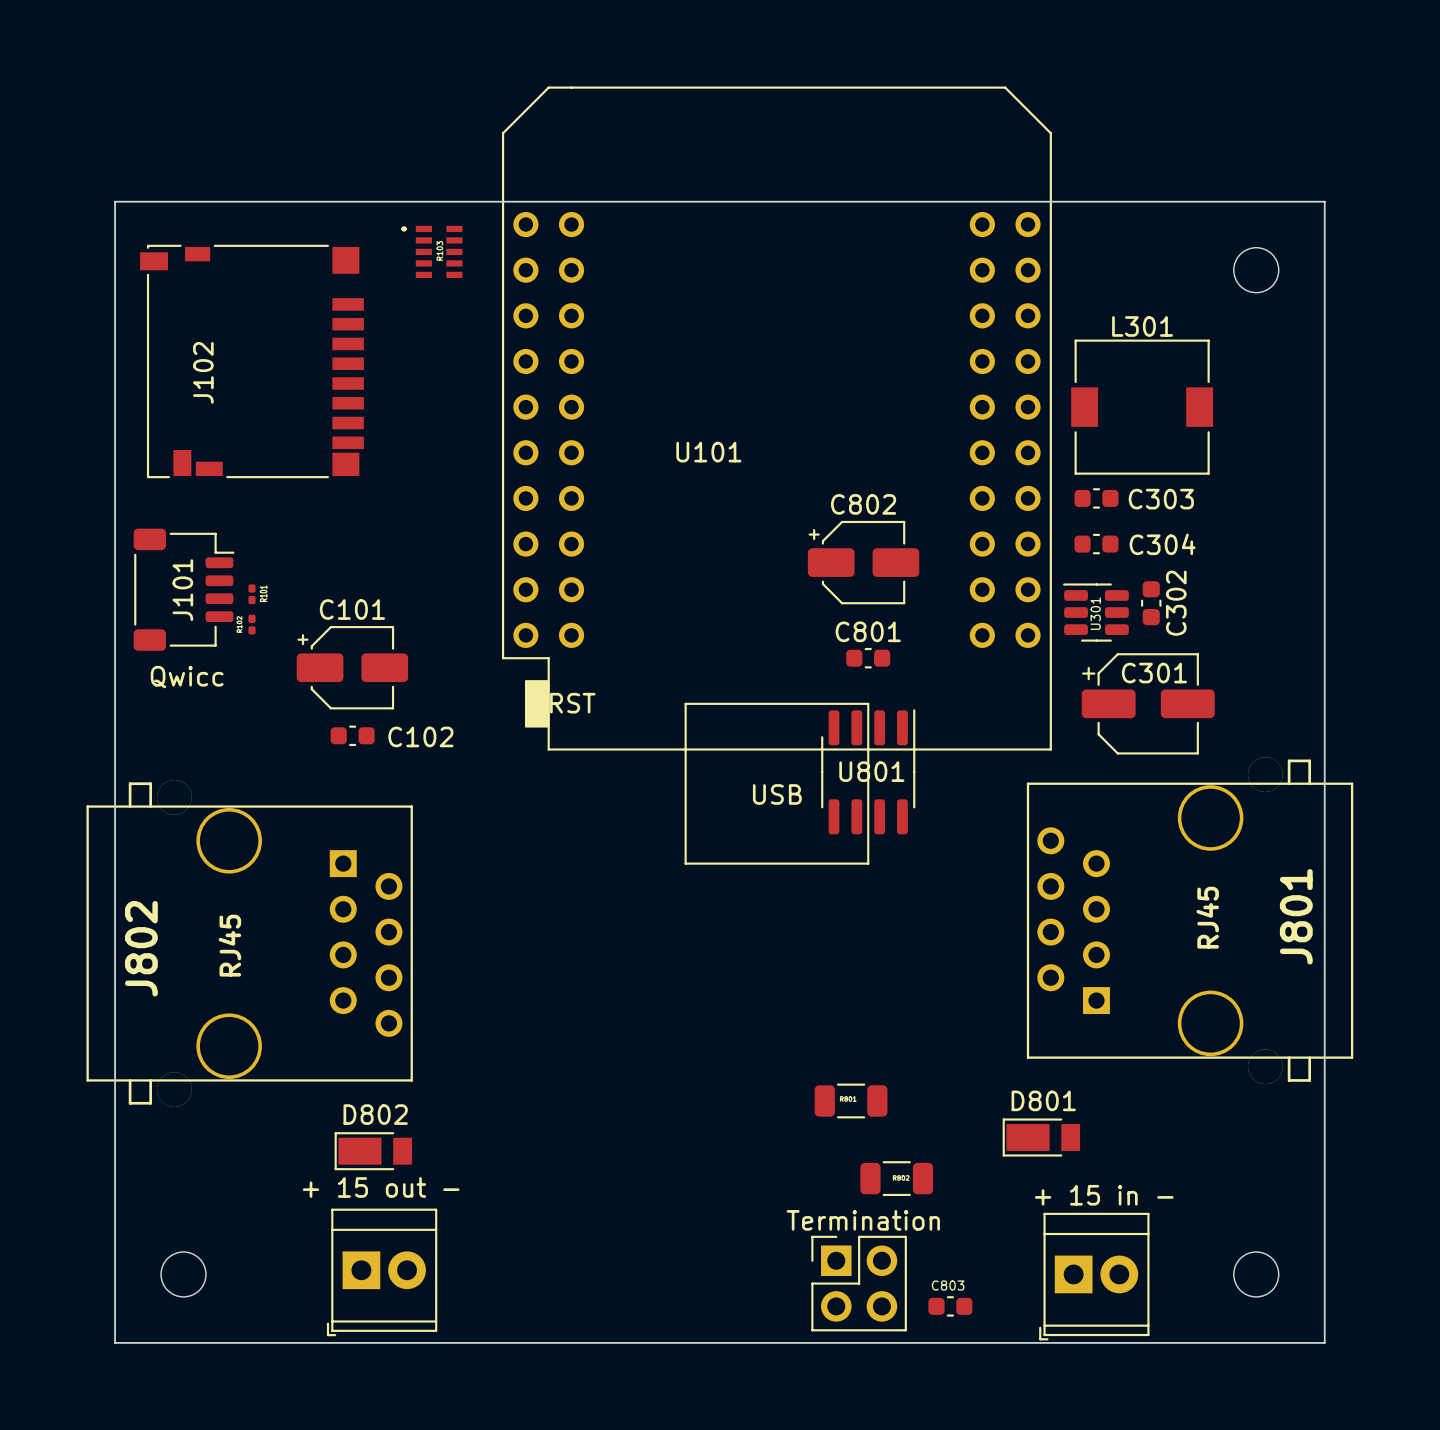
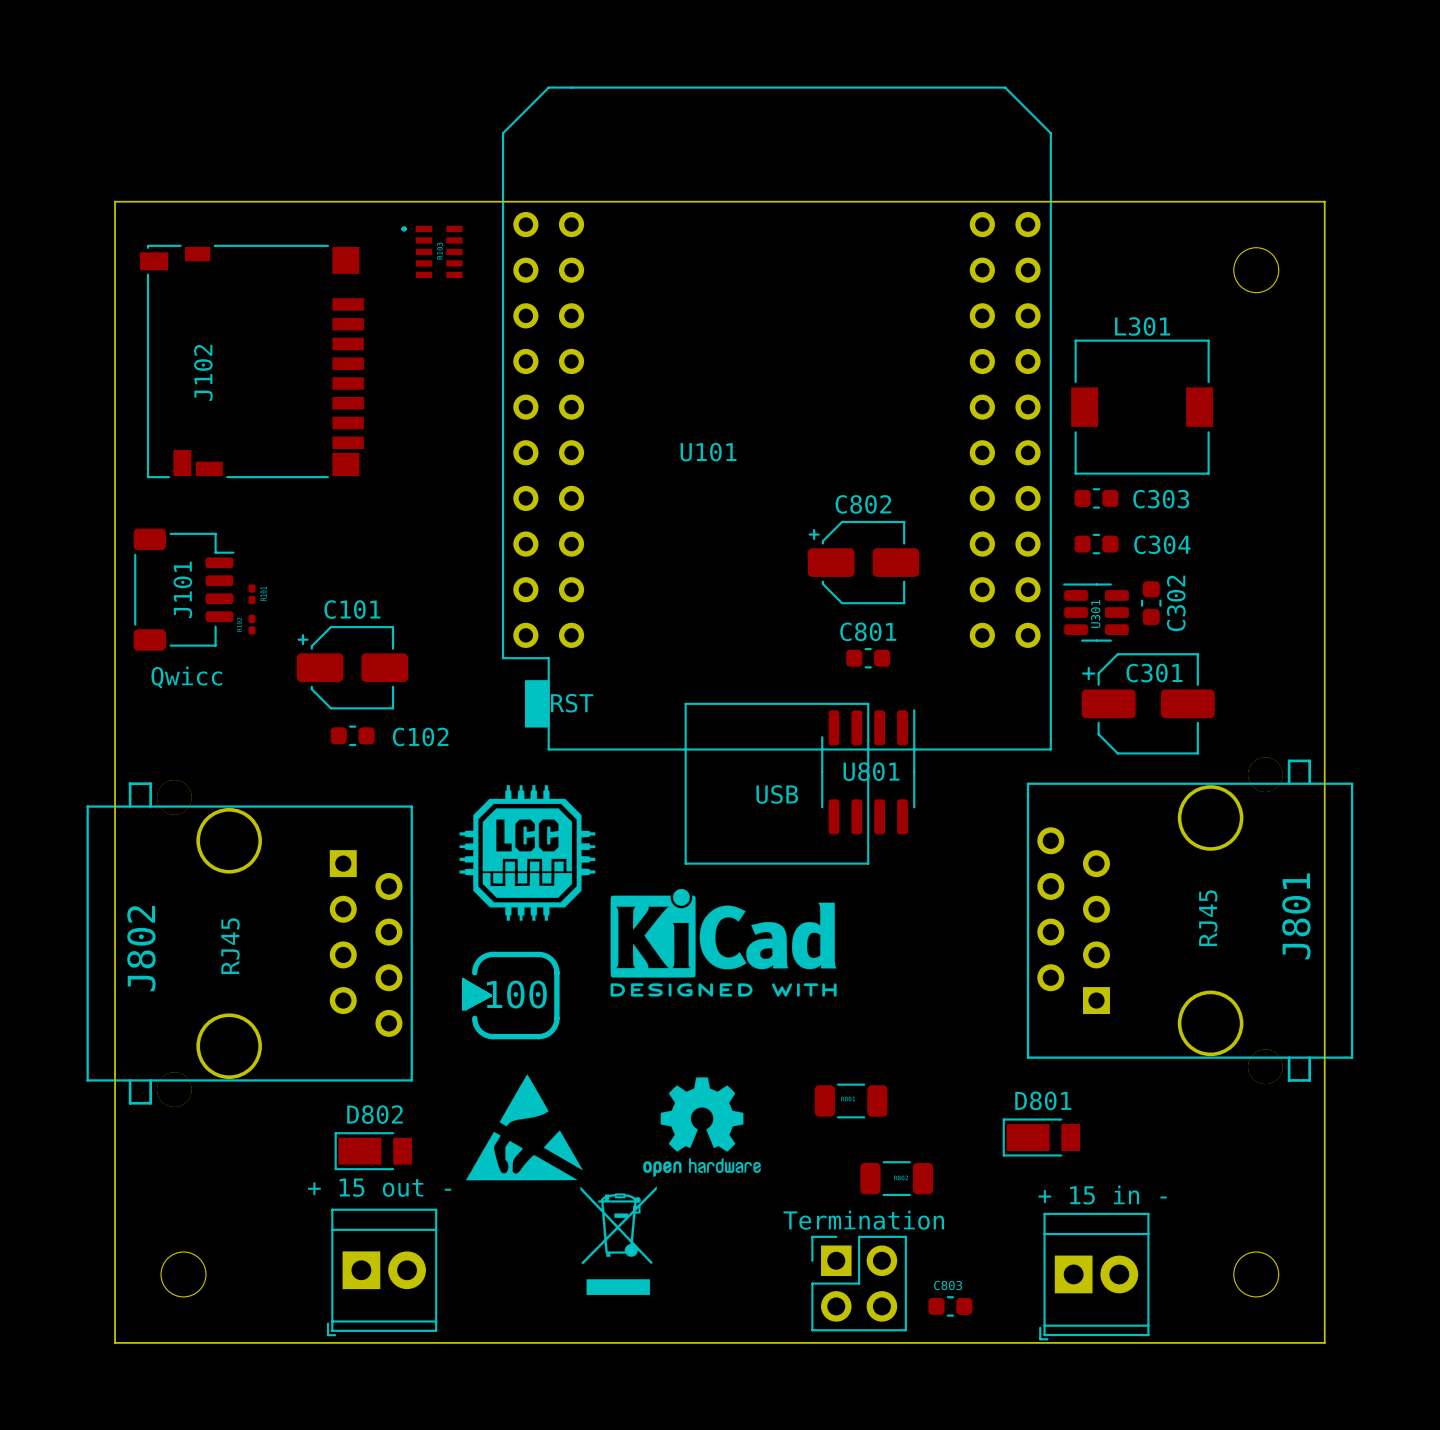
drawing: none -> [459, 785, 837, 997]
drawing: none -> [461, 951, 560, 1040]
drawing: none -> [465, 1074, 761, 1295]

